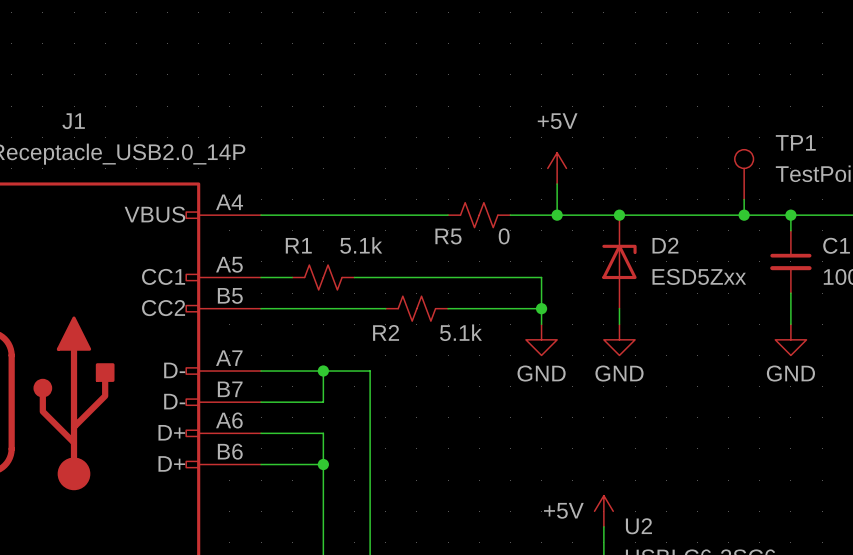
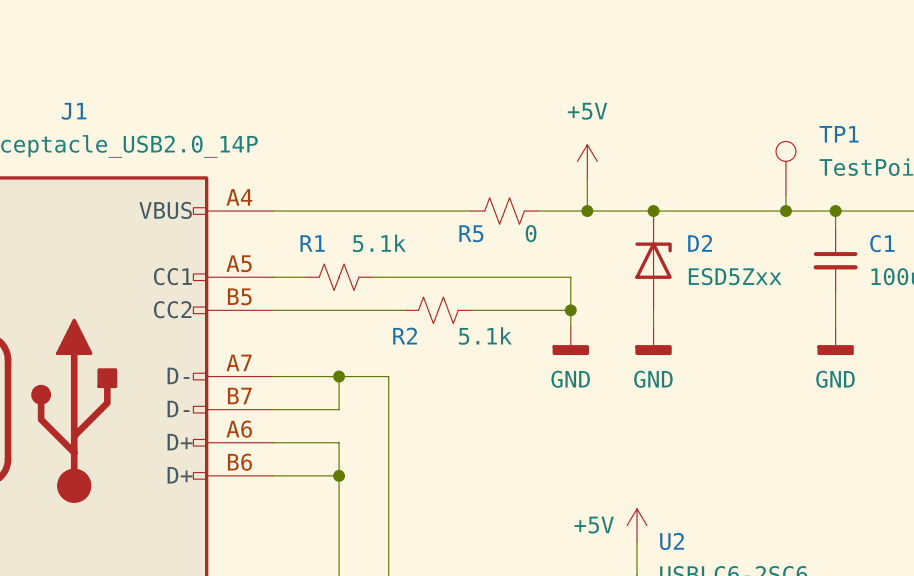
power symbol shape: [525, 324, 558, 356] -> [552, 326, 589, 356]
power symbol shape: [603, 324, 636, 356] -> [635, 326, 672, 356]
power symbol shape: [775, 324, 807, 356] -> [817, 326, 854, 356]

